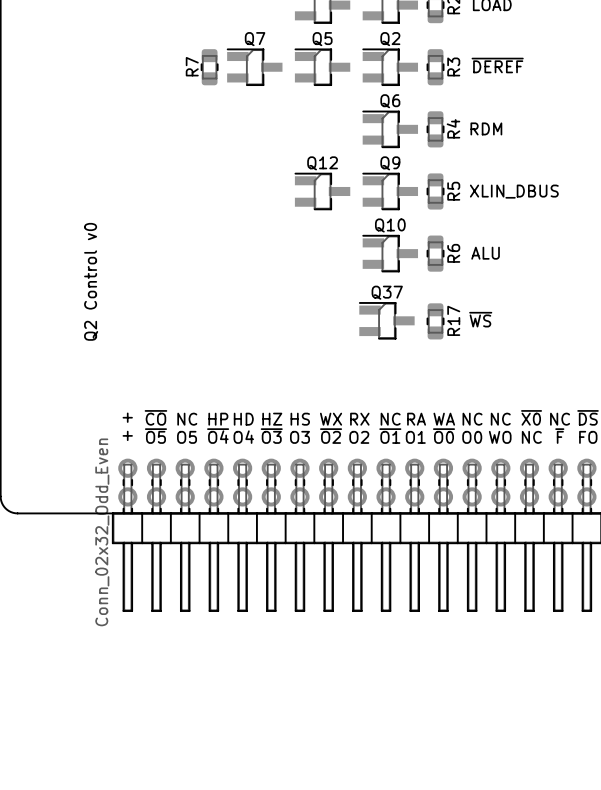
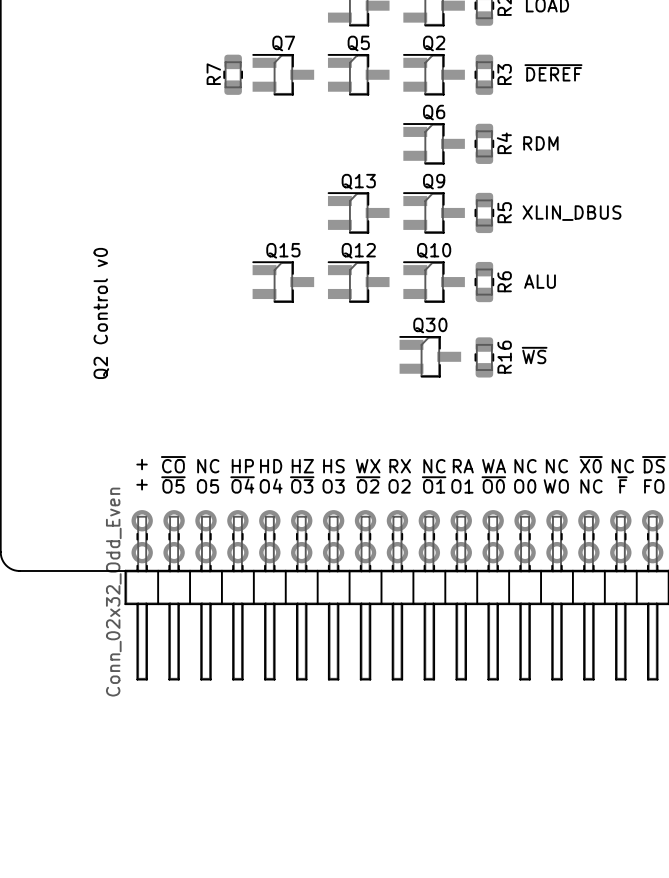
Q12 name: Q12 (322, 163) -> Q13 (358, 181)
Q15: none -> (283, 282)
Q12: none -> (358, 282)
Q37 name: Q37 (387, 292) -> Q30 (430, 325)
R17 name: R17 (453, 320) -> R16 (504, 357)

